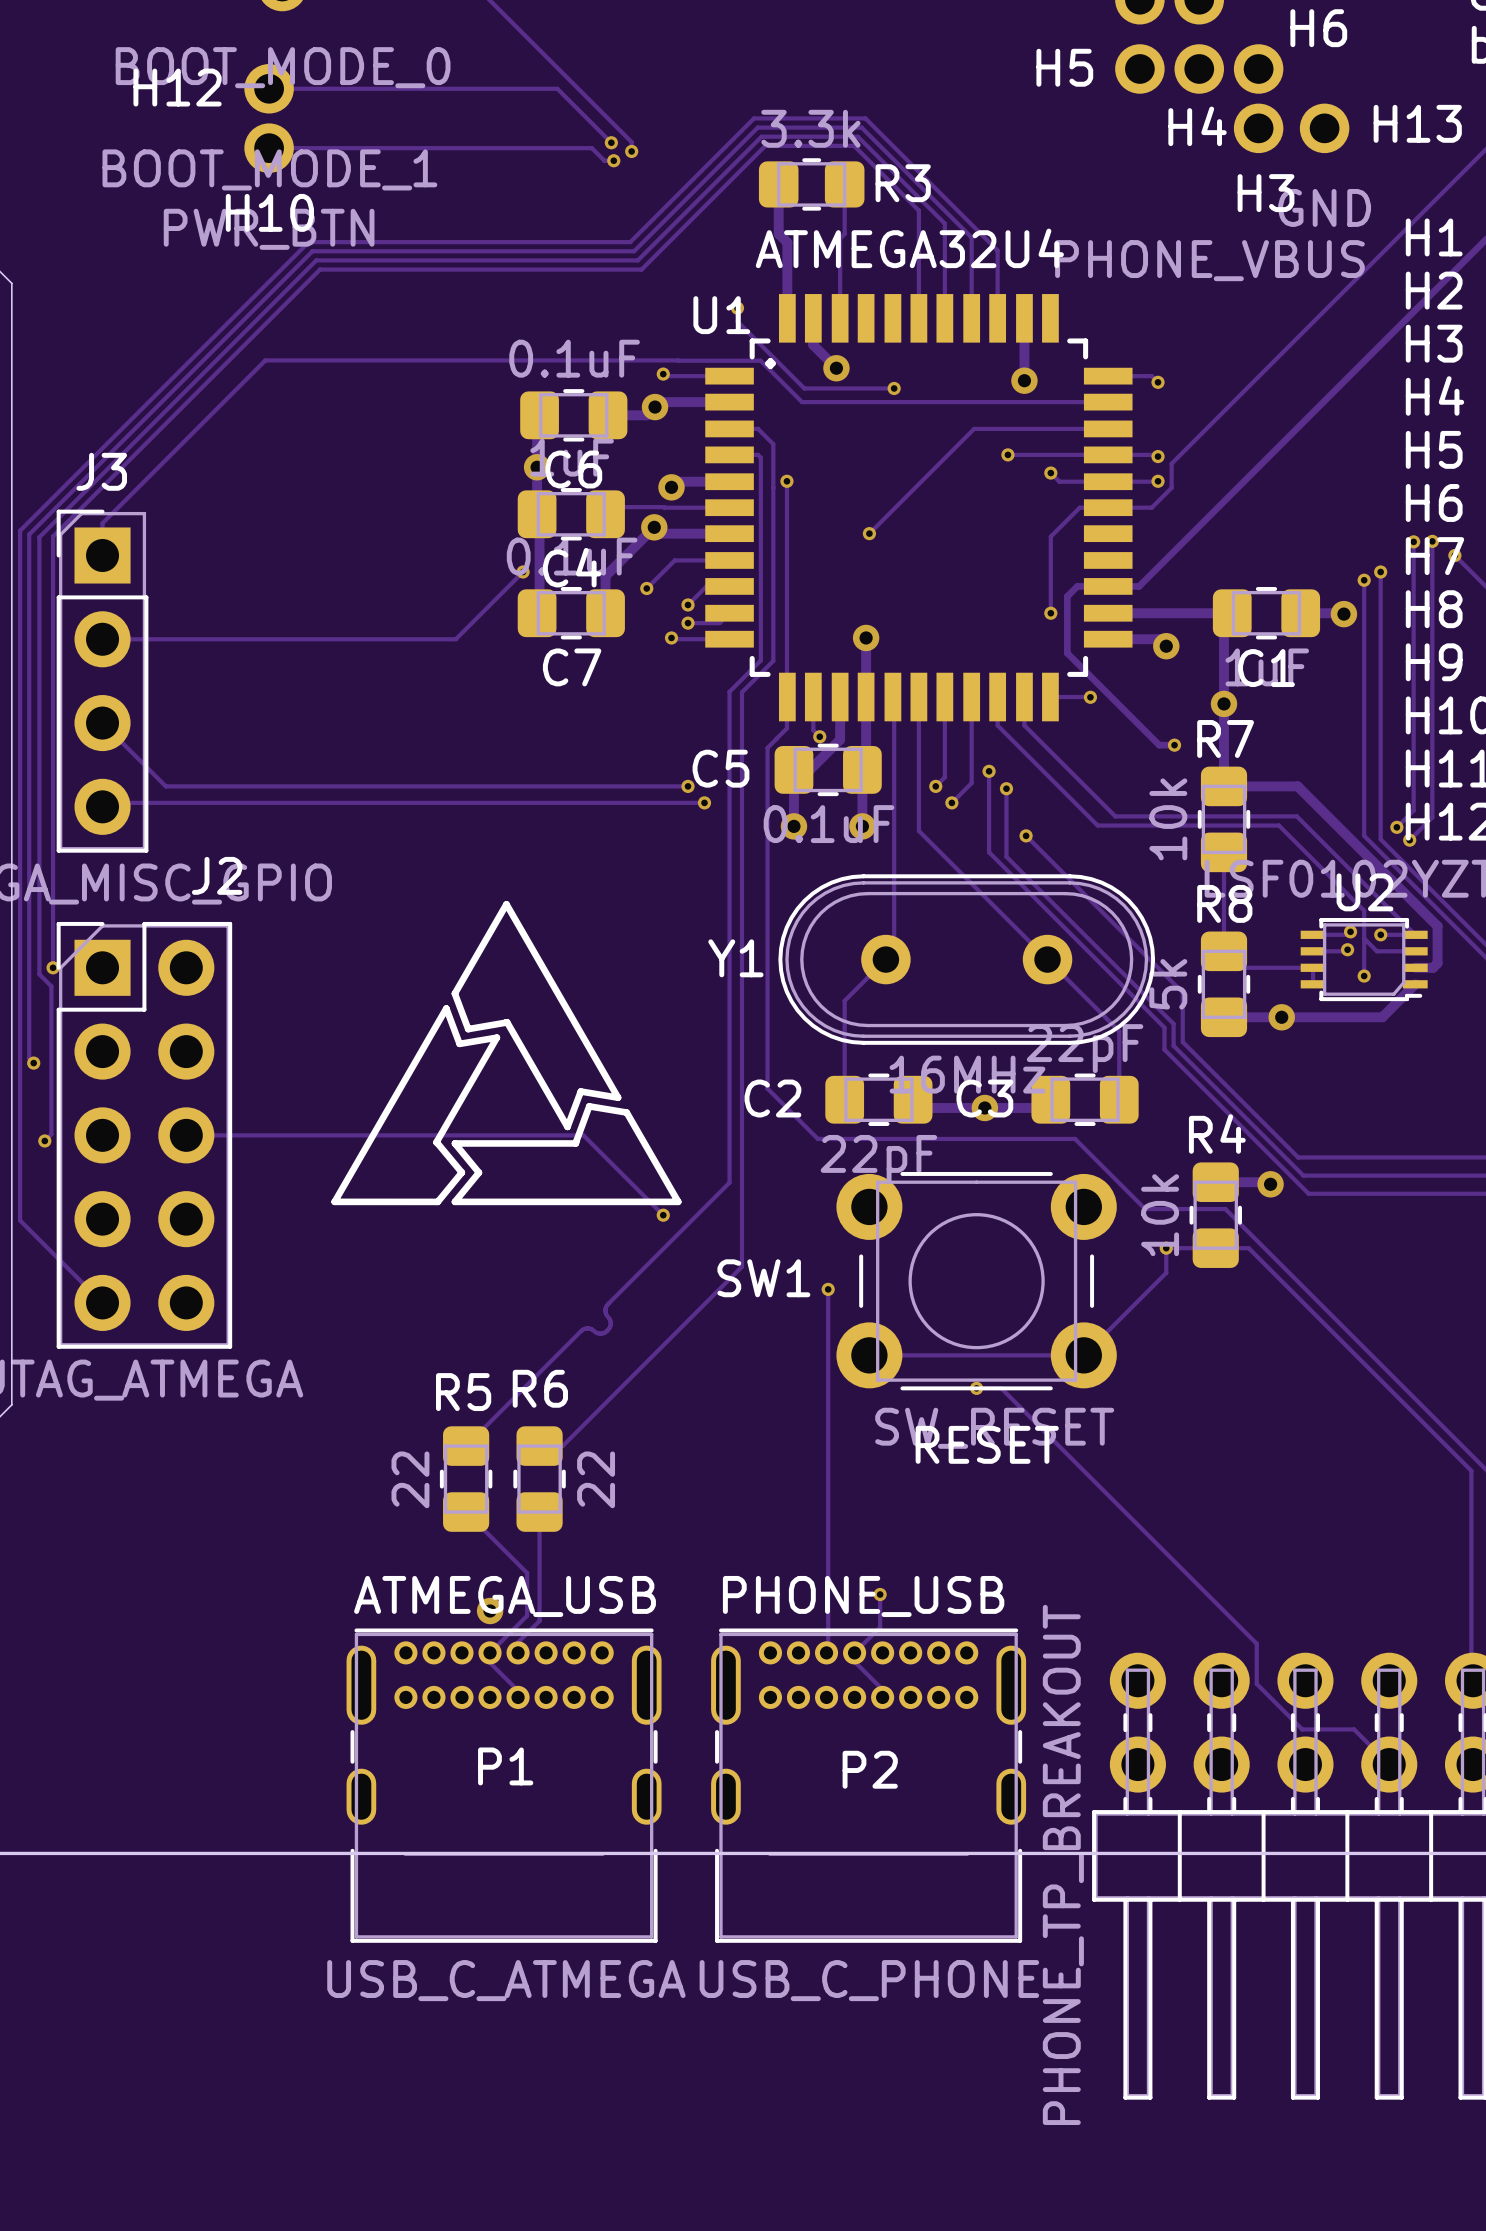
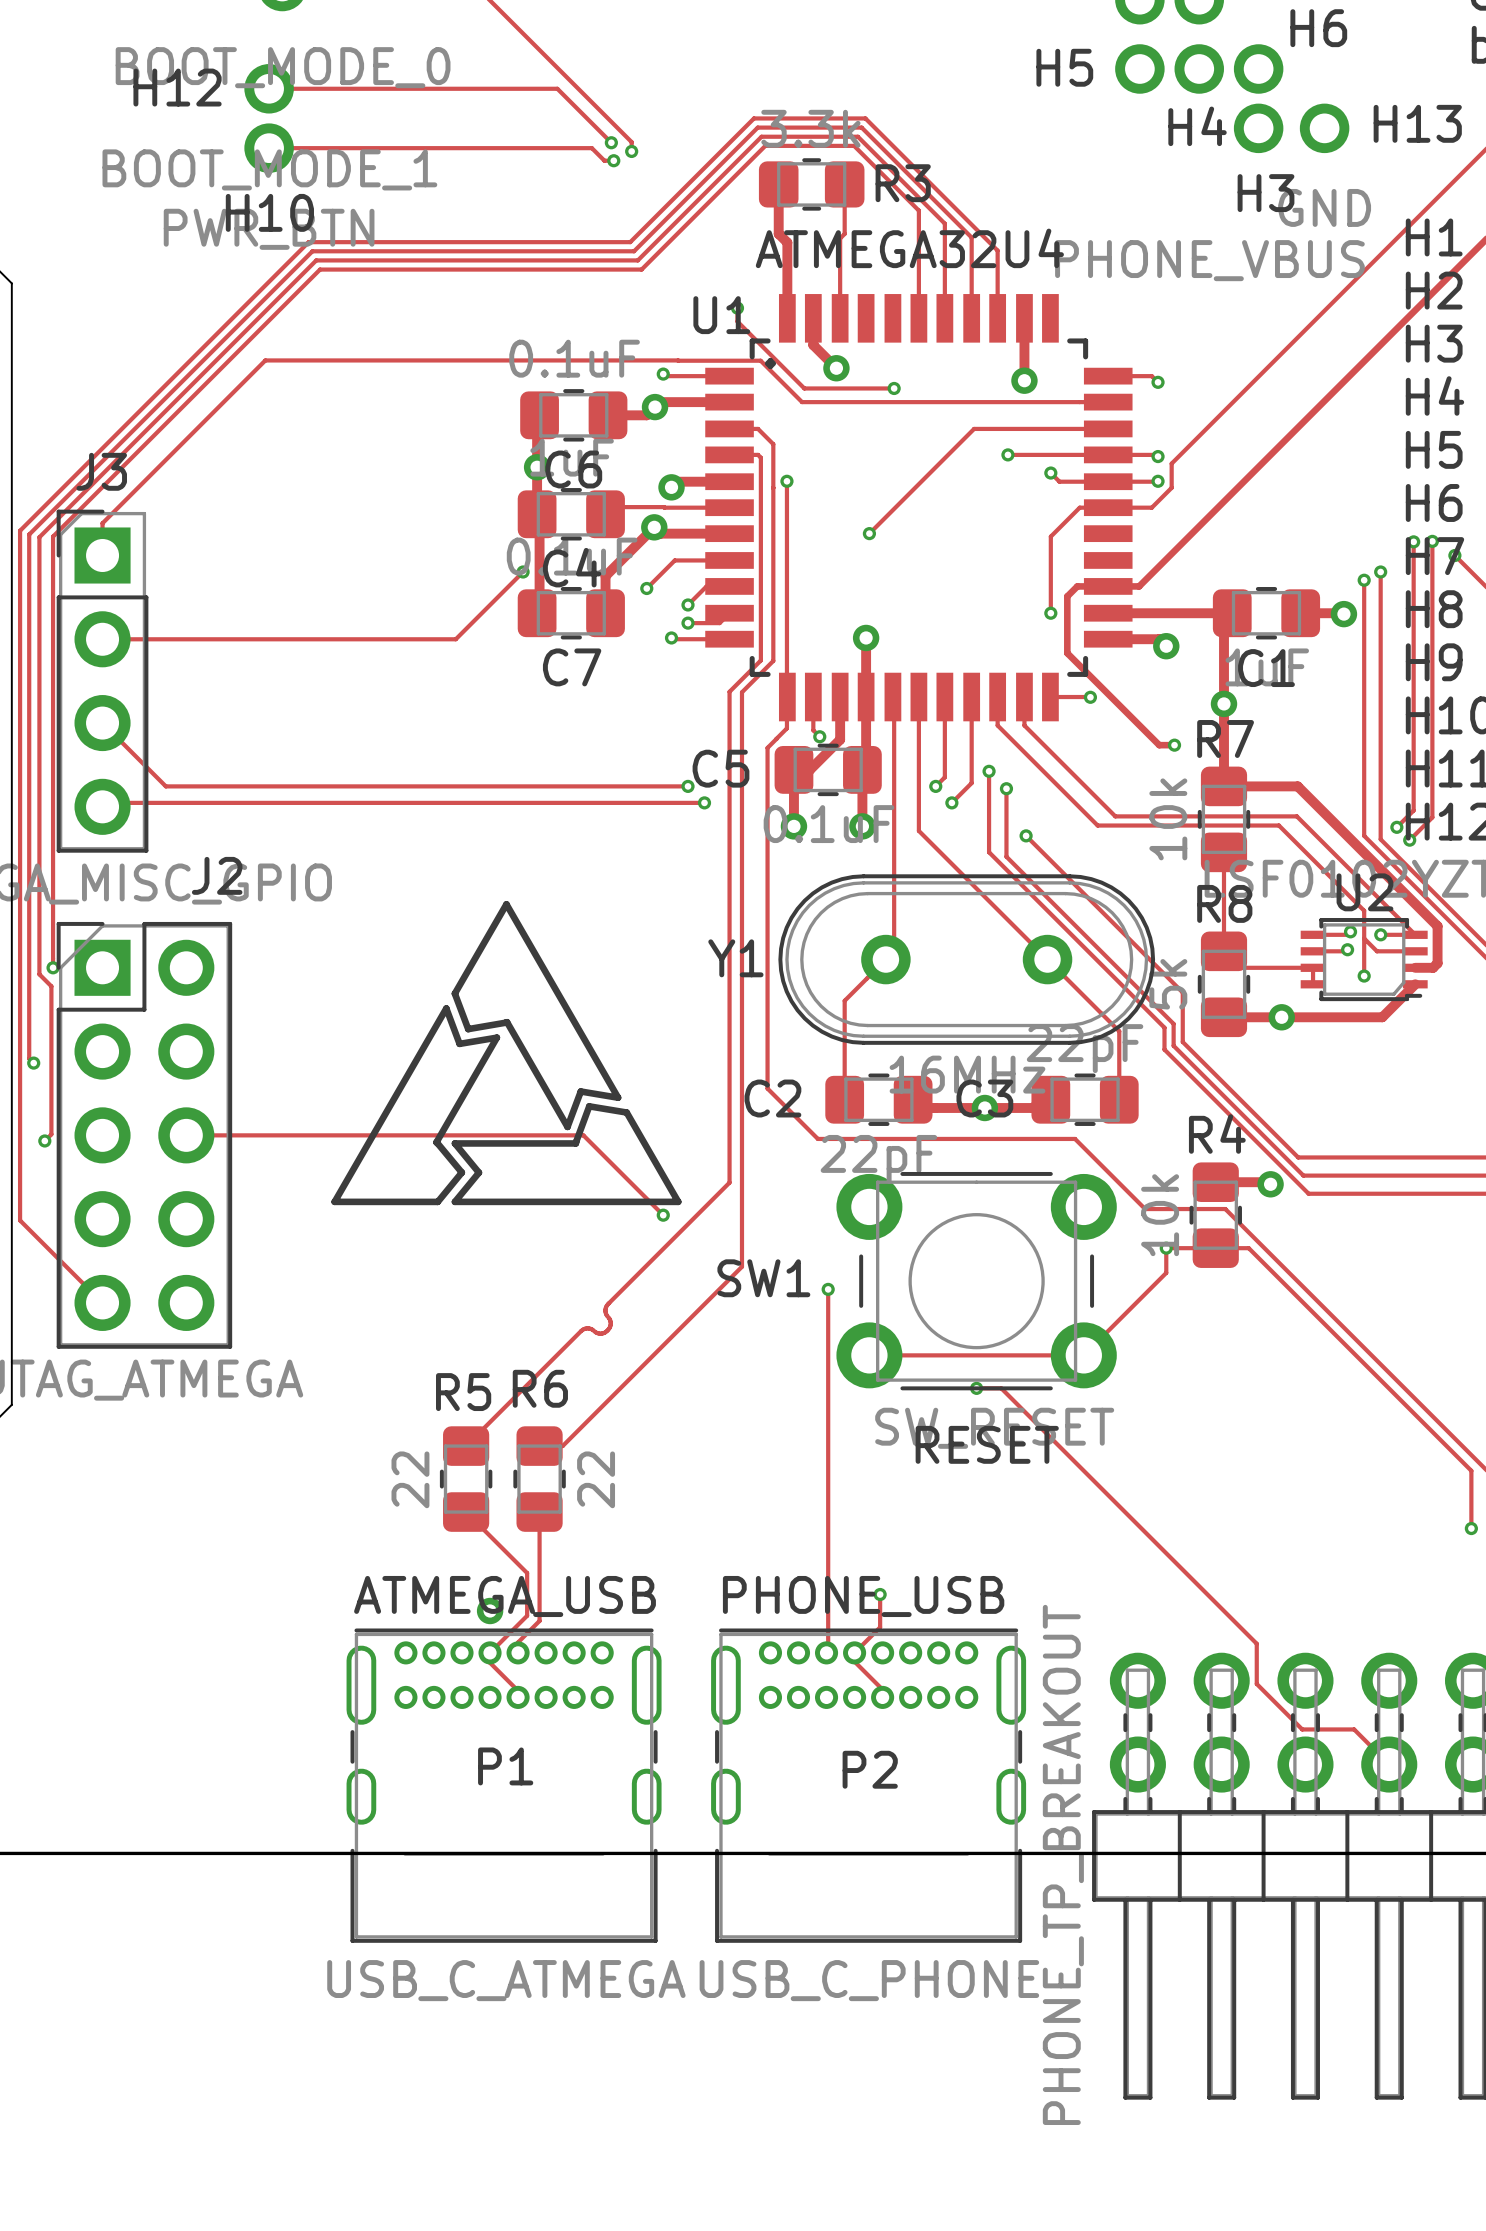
track: (1471, 1528) (1471, 1679) (1473, 1680) -> none
via: none -> (1471, 1528)

